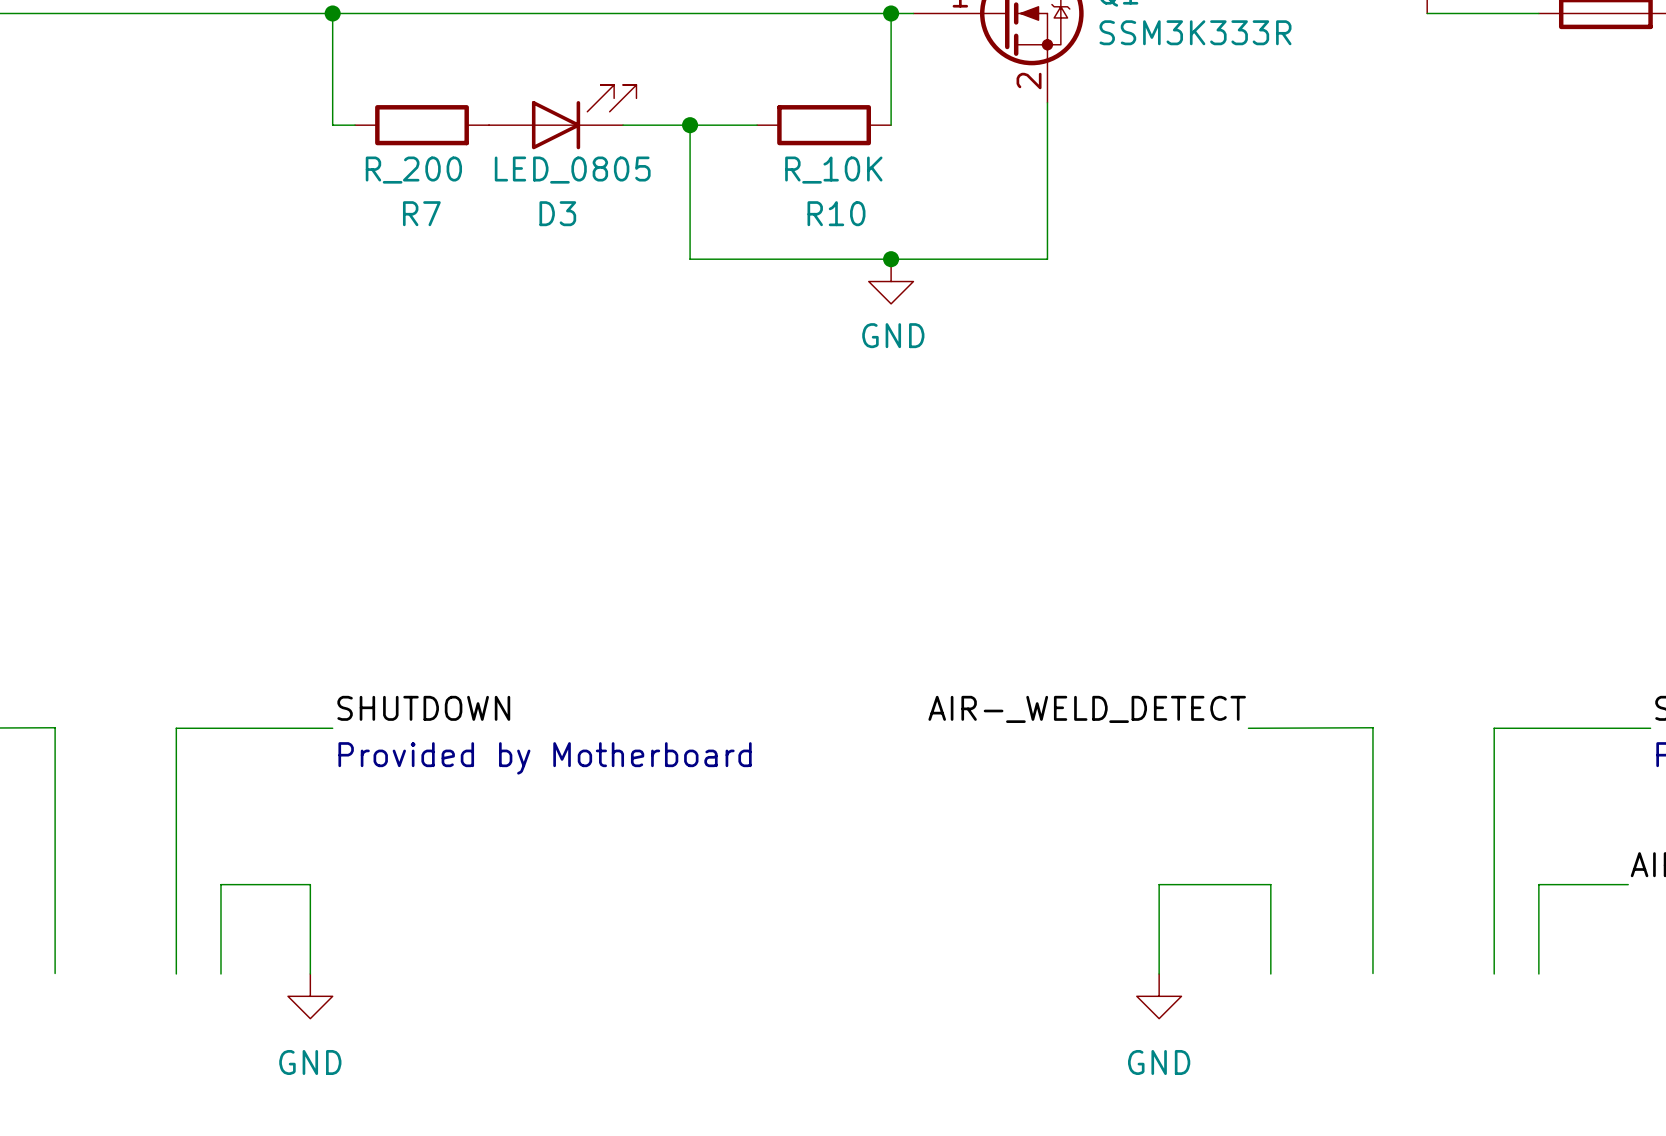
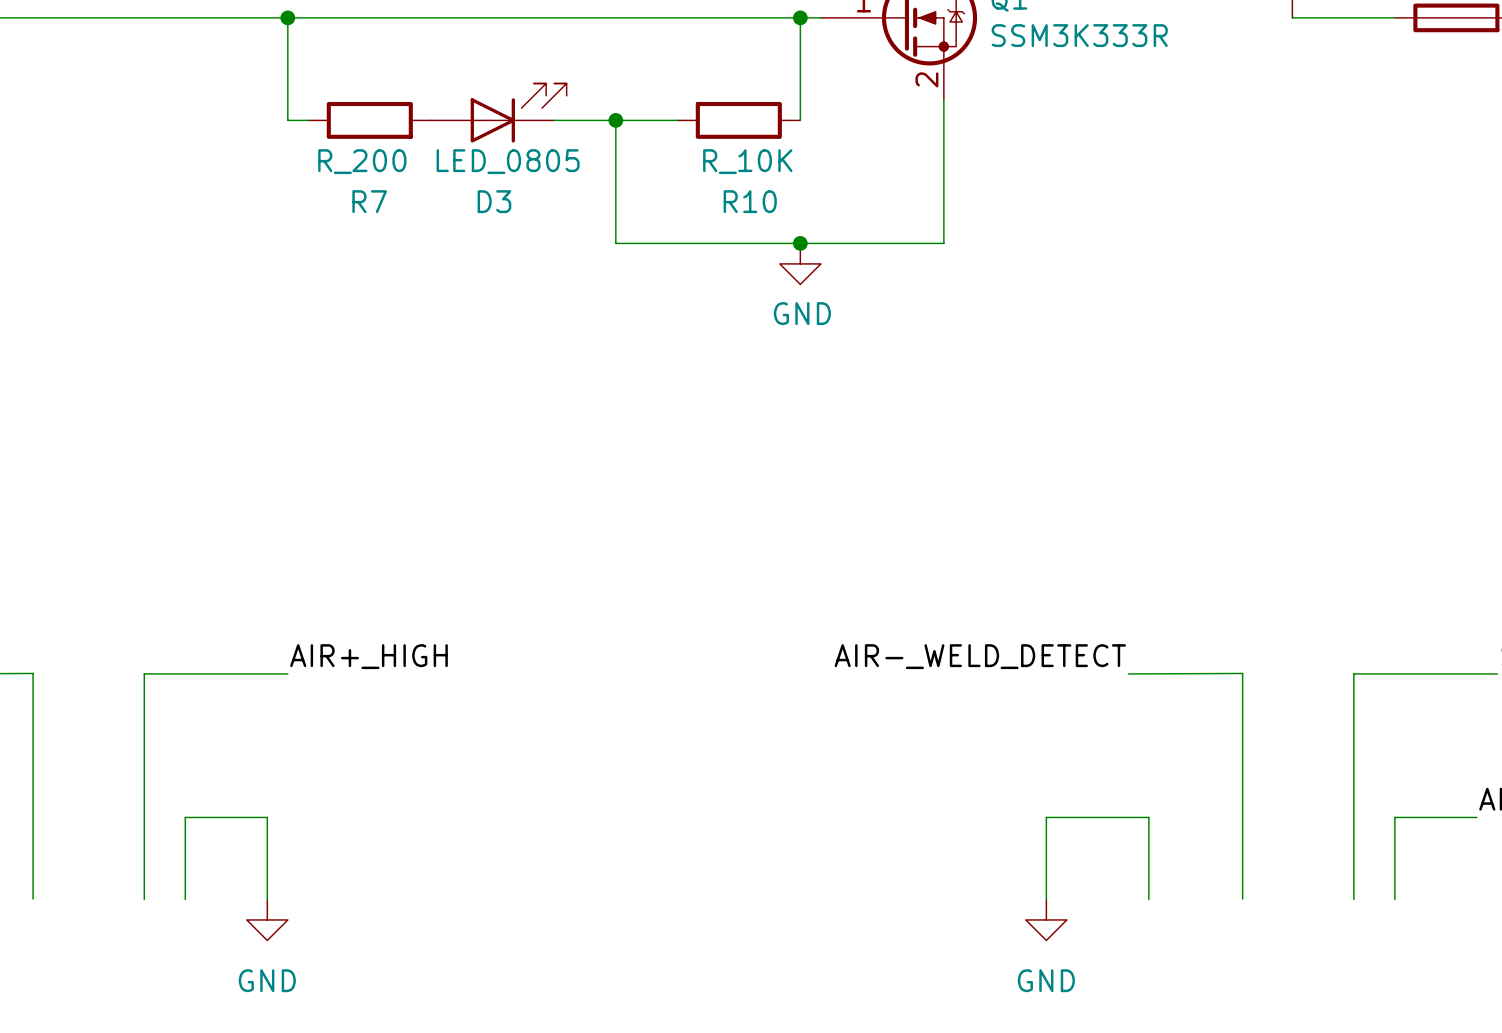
label: SHUTDOWN (423, 708) -> AIR+_HIGH (368, 656)
text: Provided by Motherboard (545, 758) -> none

